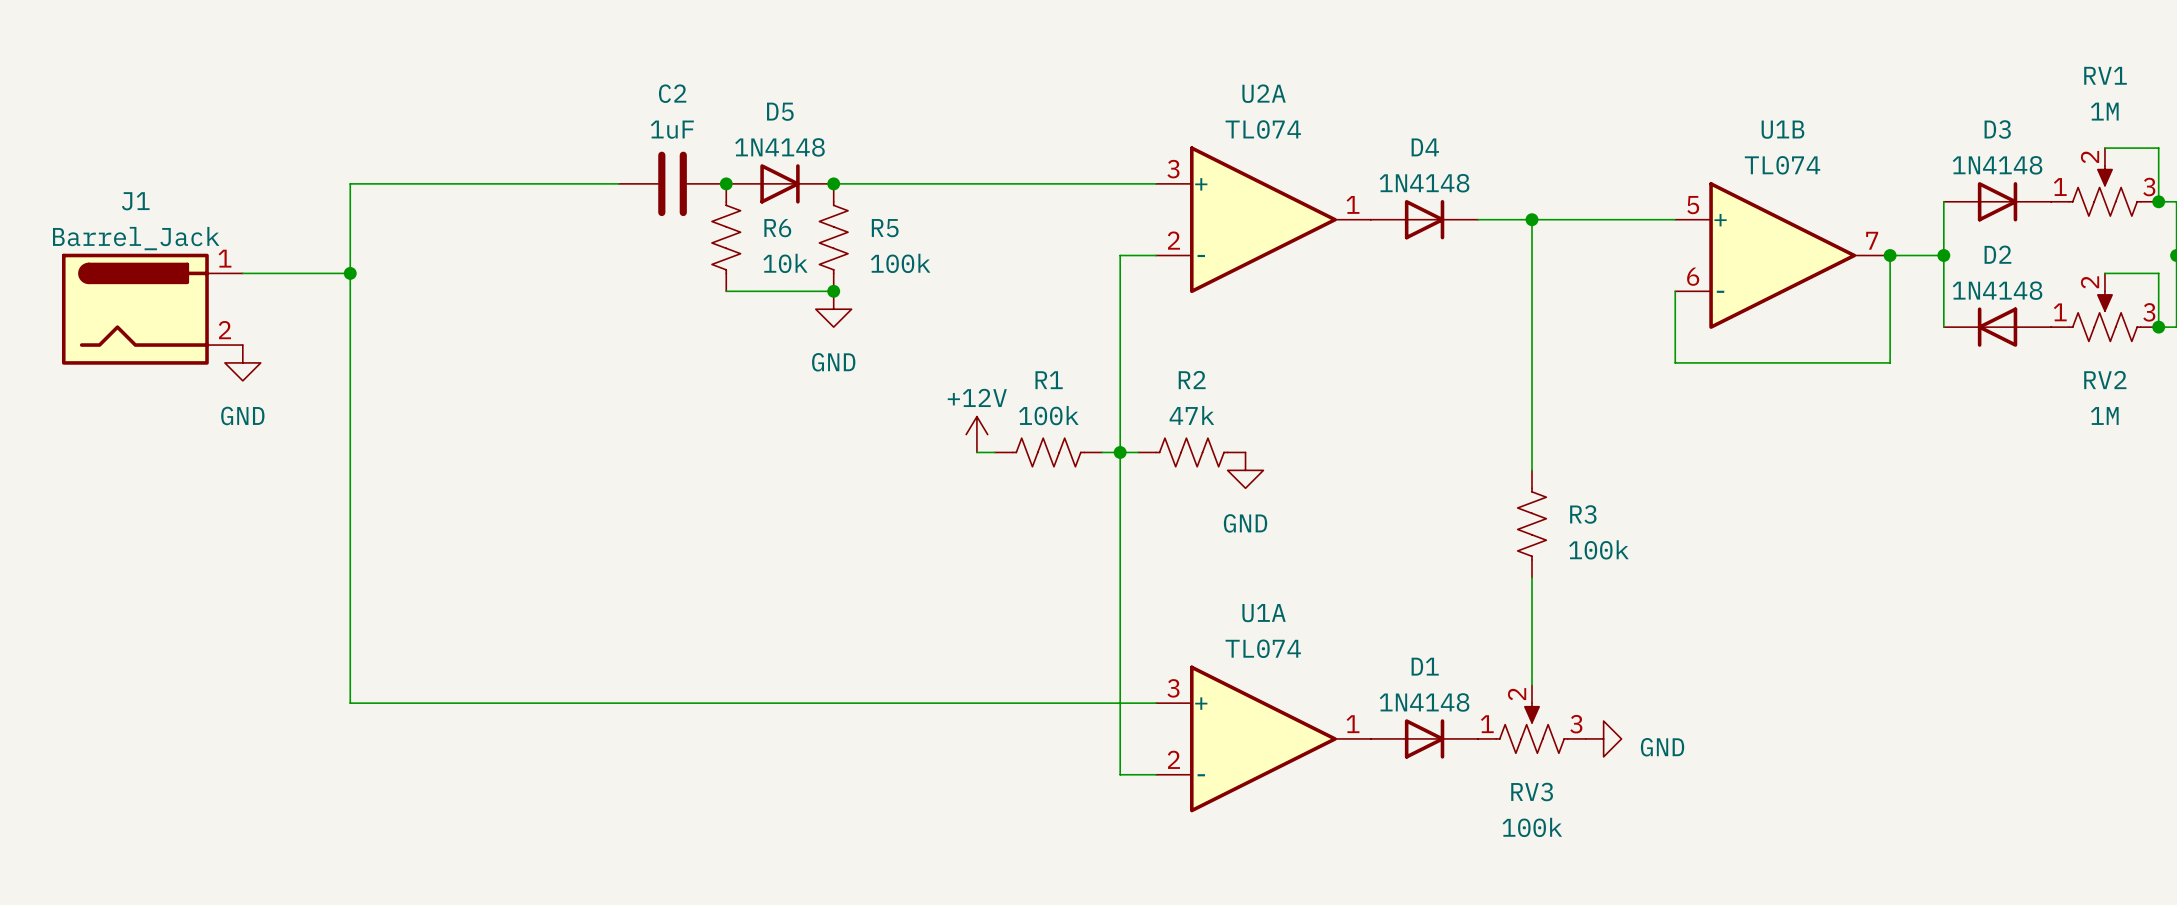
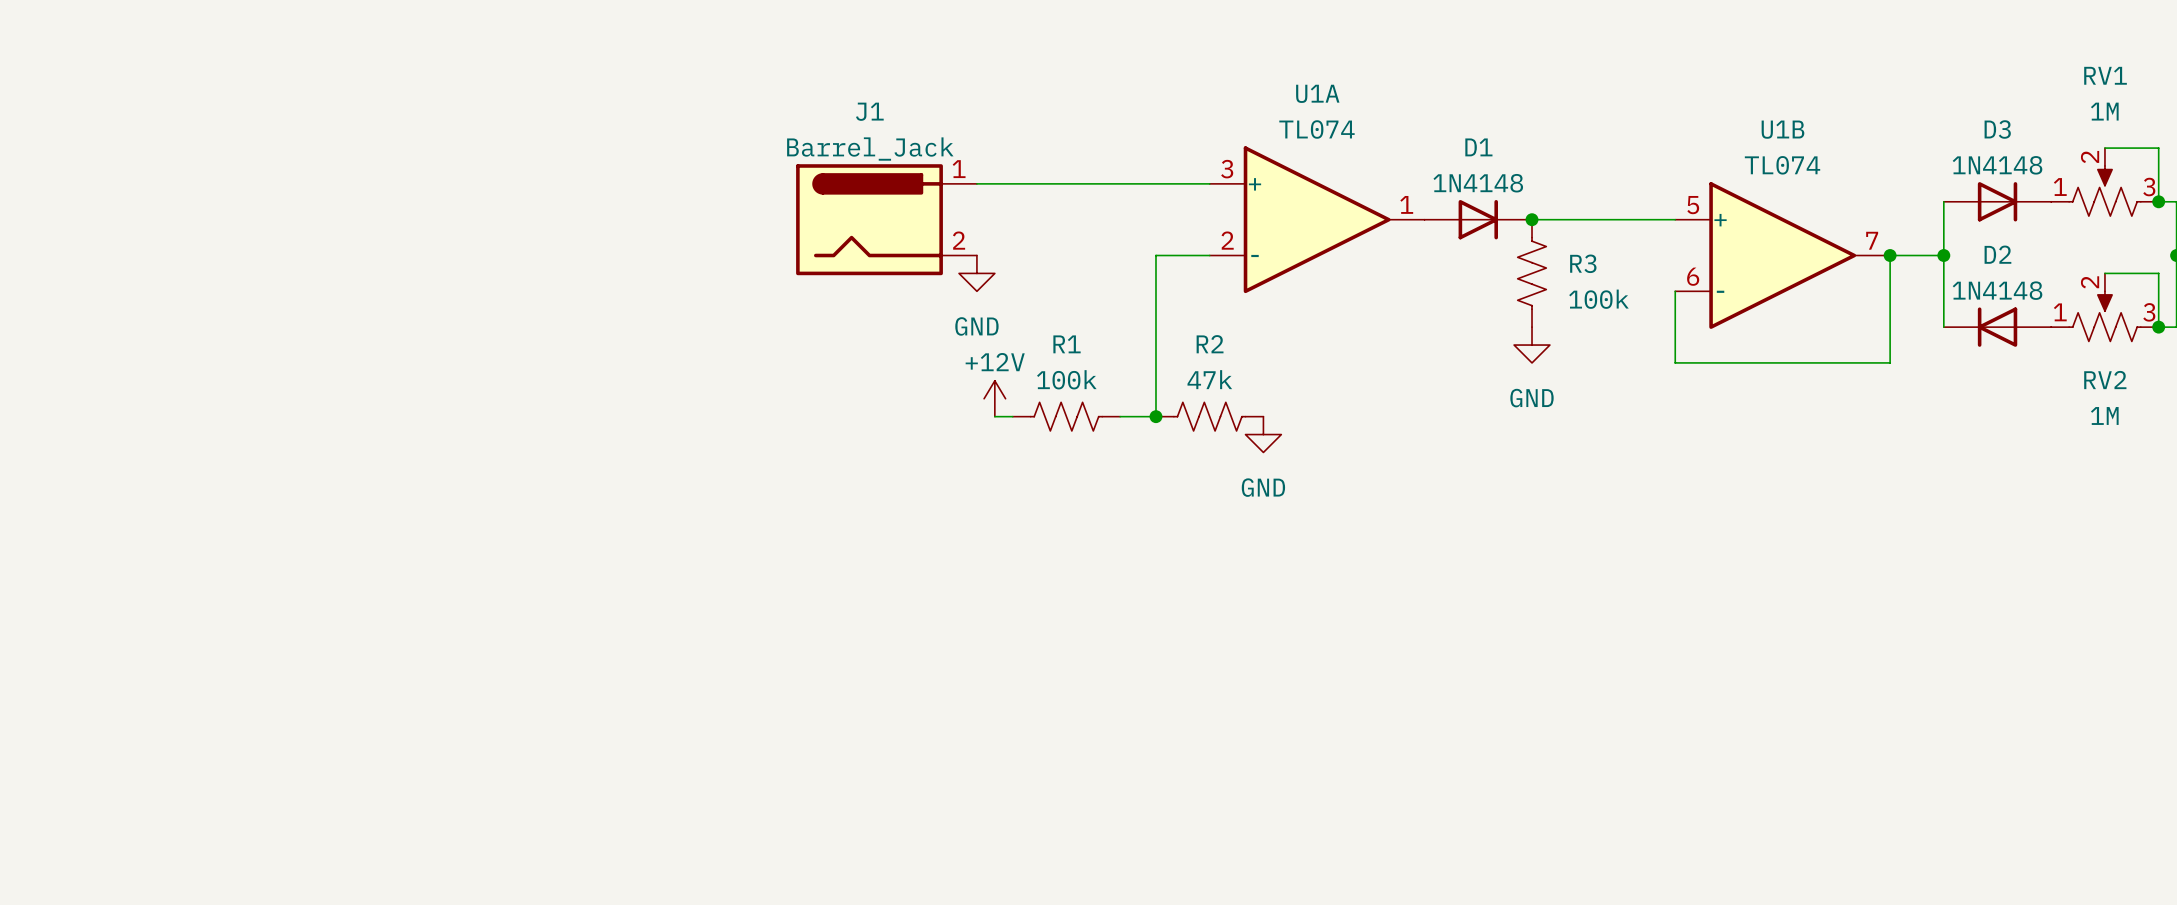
wire: (618, 183) (350, 183) (350, 703) (1155, 703) -> none
C2: 1uF (672, 183) -> none
junction: (726, 183) -> none
D5: 1N4148 (779, 183) -> none
junction: (833, 183) -> none
U2A: TL074 (1263, 219) -> none
D4: 1N4148 (1424, 219) -> none
wire: (1478, 219) (1532, 219) (1532, 470) -> none
R6: 10k (726, 237) -> none
R5: 100k (833, 237) -> none
wire: (1155, 255) (1120, 255) (1120, 774) (1155, 774) -> none
wire: none -> (1209, 255) (1155, 255) (1155, 416) (1120, 416)
wire: (242, 273) (350, 273) -> none
junction: (350, 273) -> none
wire: (726, 291) (833, 291) -> none
junction: (833, 291) -> none
J1 position: (152, 309) -> (886, 219)
power symbol position: GND (833, 309) -> GND (976, 273)
power symbol: none -> GND (1532, 345)
power symbol: GND (242, 362) -> none
power symbol position: +12V (976, 434) -> +12V (994, 398)
wire: (976, 452) (994, 452) -> (994, 416) (1012, 416)
R1 position: (1048, 452) -> (1066, 416)
wire: (1102, 452) (1138, 452) -> none
junction position: (1120, 452) -> (1155, 416)
R2 position: (1191, 452) -> (1209, 416)
power symbol position: GND (1245, 470) -> GND (1263, 434)
R3 position: (1532, 524) -> (1532, 273)
wire: (1532, 577) (1532, 685) -> none
RV3: 100k (1532, 719) -> none
U1A position: (1263, 738) -> (1317, 219)
D1 position: (1424, 738) -> (1478, 219)
power symbol: GND (1603, 738) -> none

